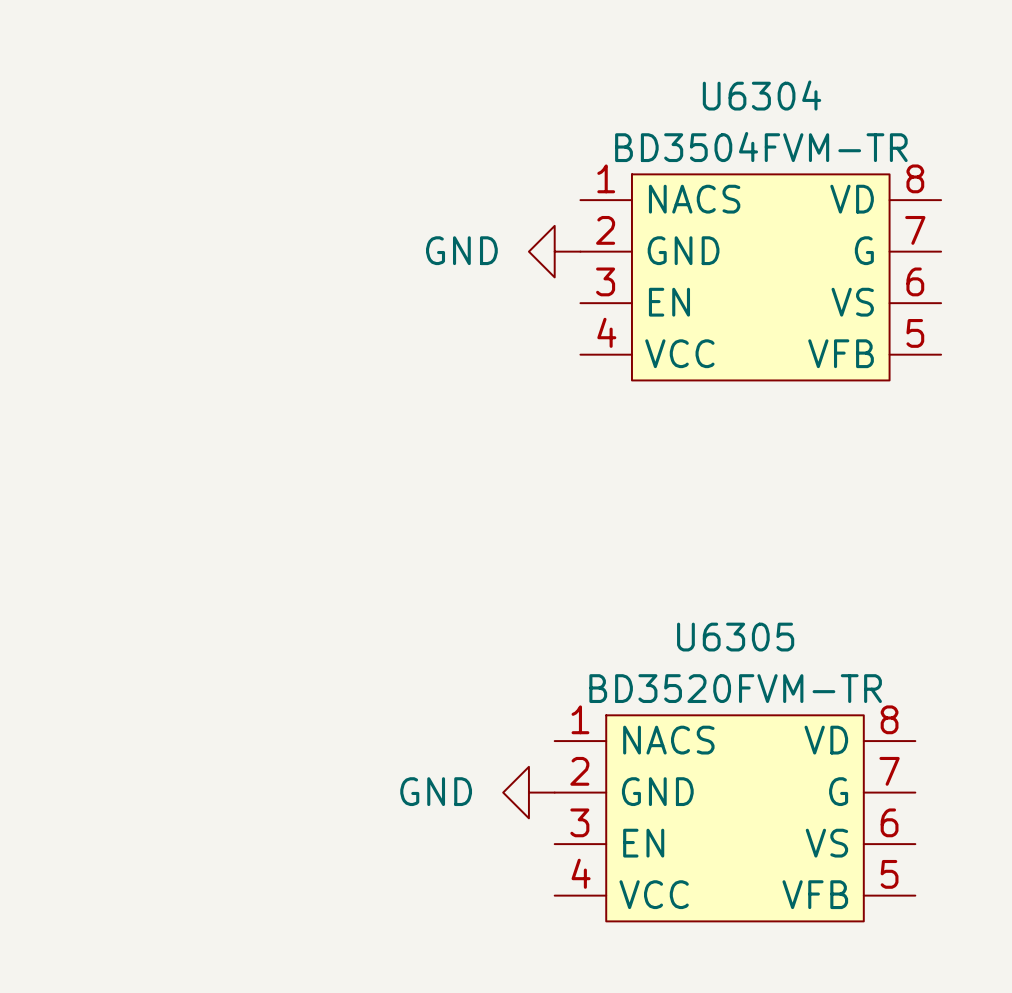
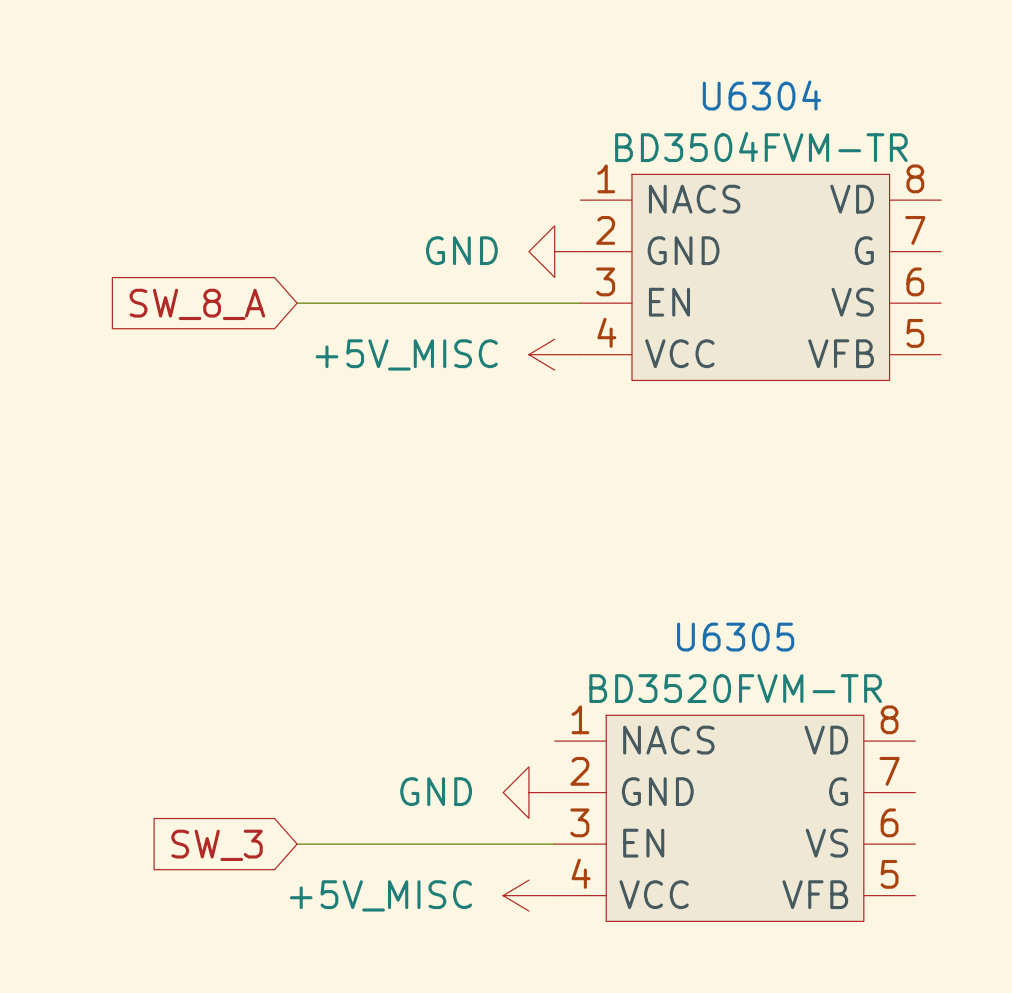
wire: none -> (297, 303) (580, 303)
global label: none -> SW_8_A (197, 304)
power symbol: none -> +5V_MISC (554, 354)
wire: none -> (297, 844) (554, 844)
global label: none -> SW_3 (217, 845)
power symbol: none -> +5V_MISC (528, 895)

